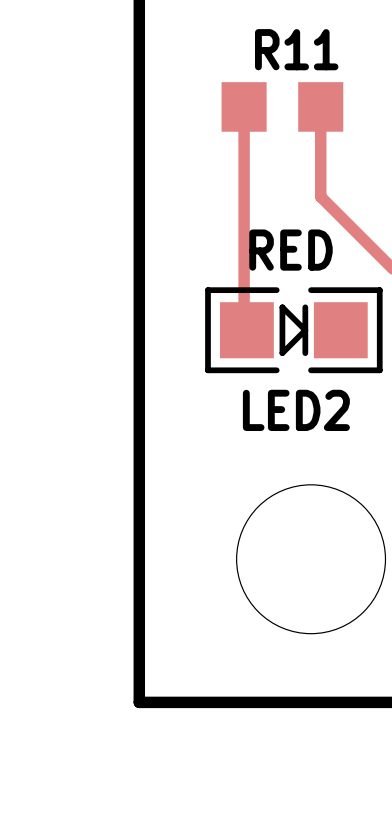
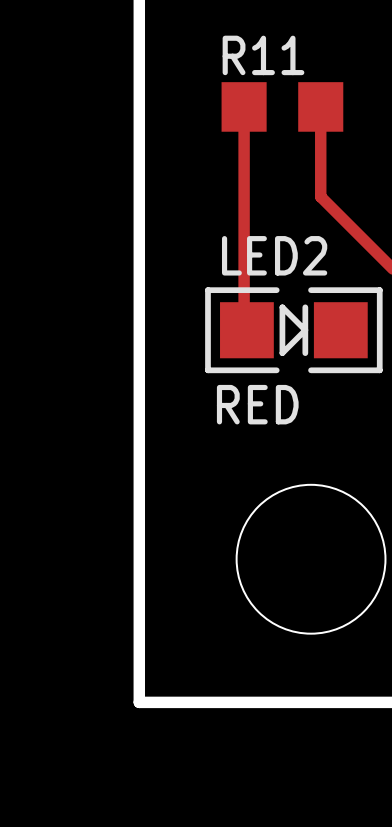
R11 name position: R11 (296, 49) -> R11 (263, 55)
LED2 value position: RED (290, 250) -> RED (257, 404)
LED2 name position: LED2 (296, 410) -> LED2 (274, 255)

